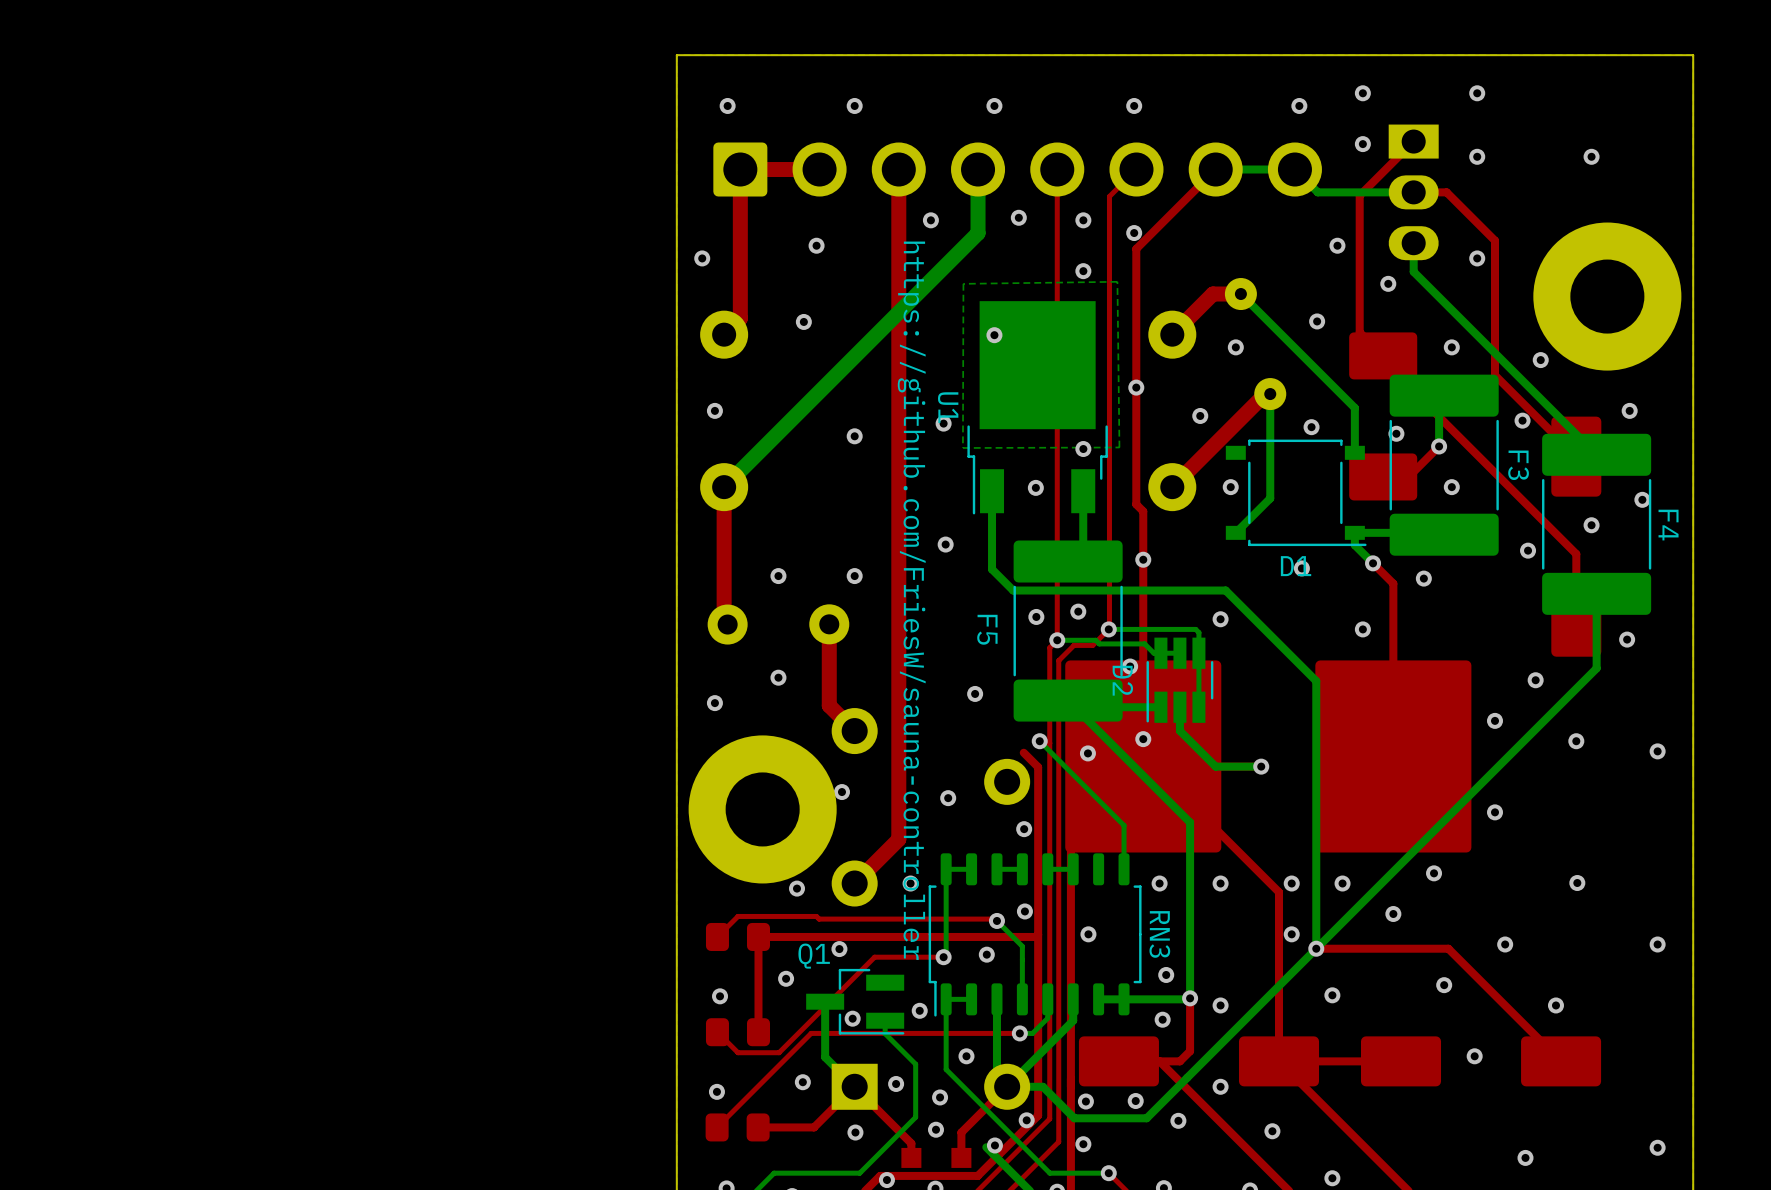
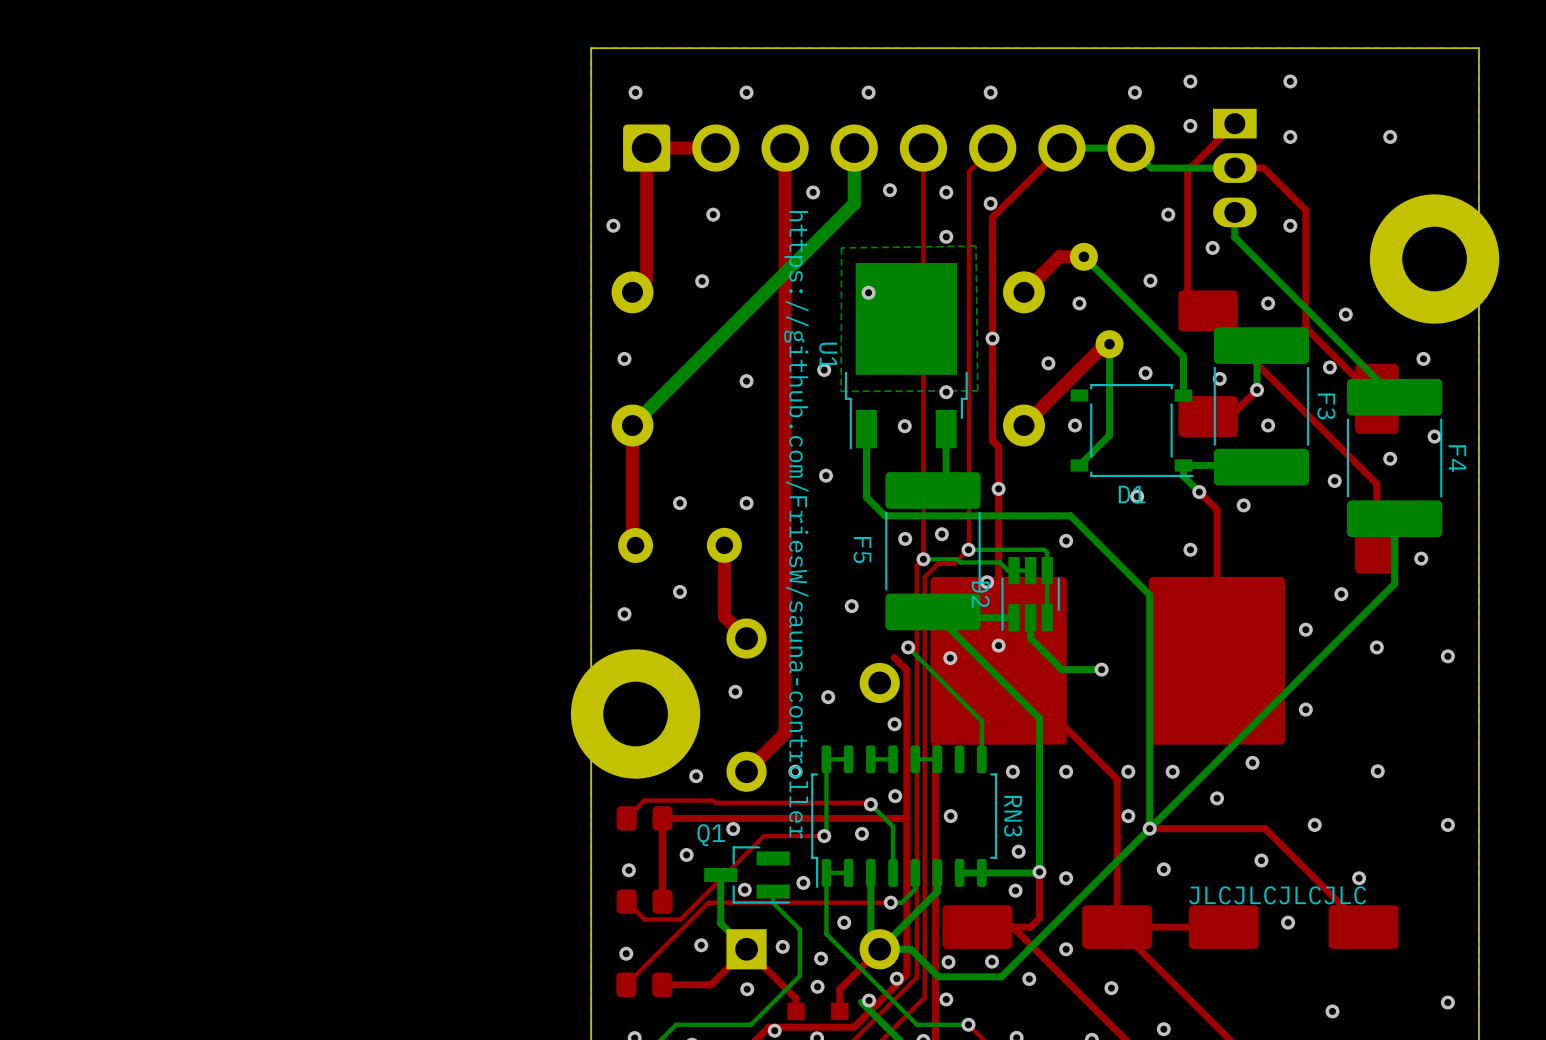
part position: (1607, 296) -> (1434, 259)
part position: (762, 809) -> (635, 714)
text: none -> JLCJLCJLCJLC (1277, 895)

